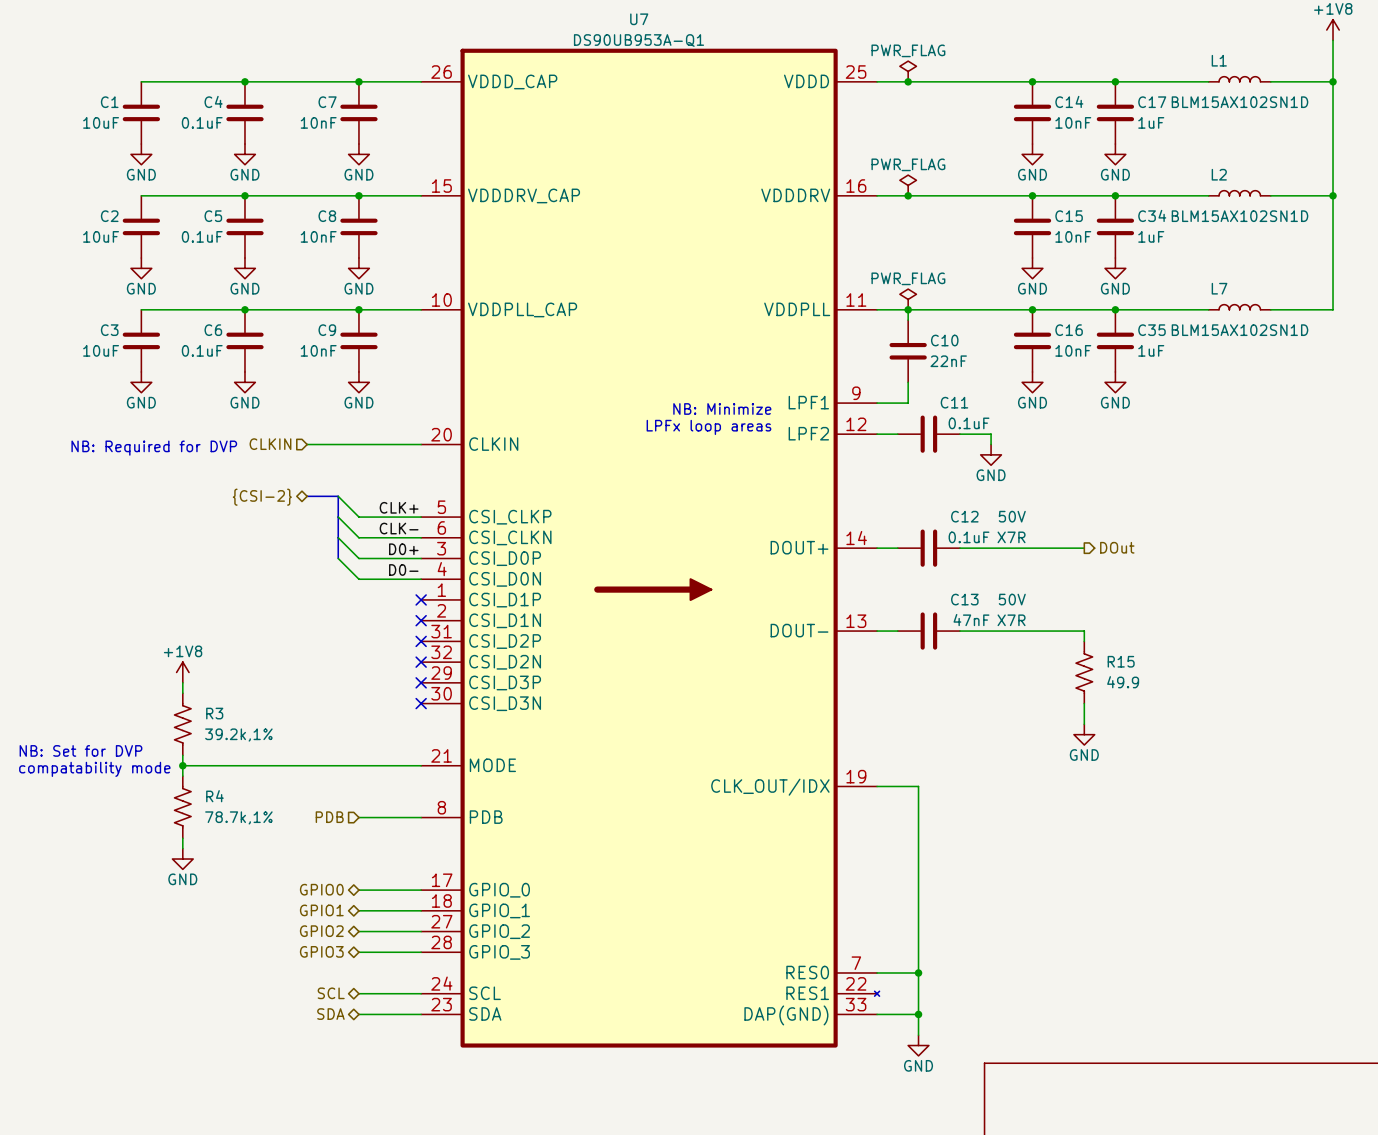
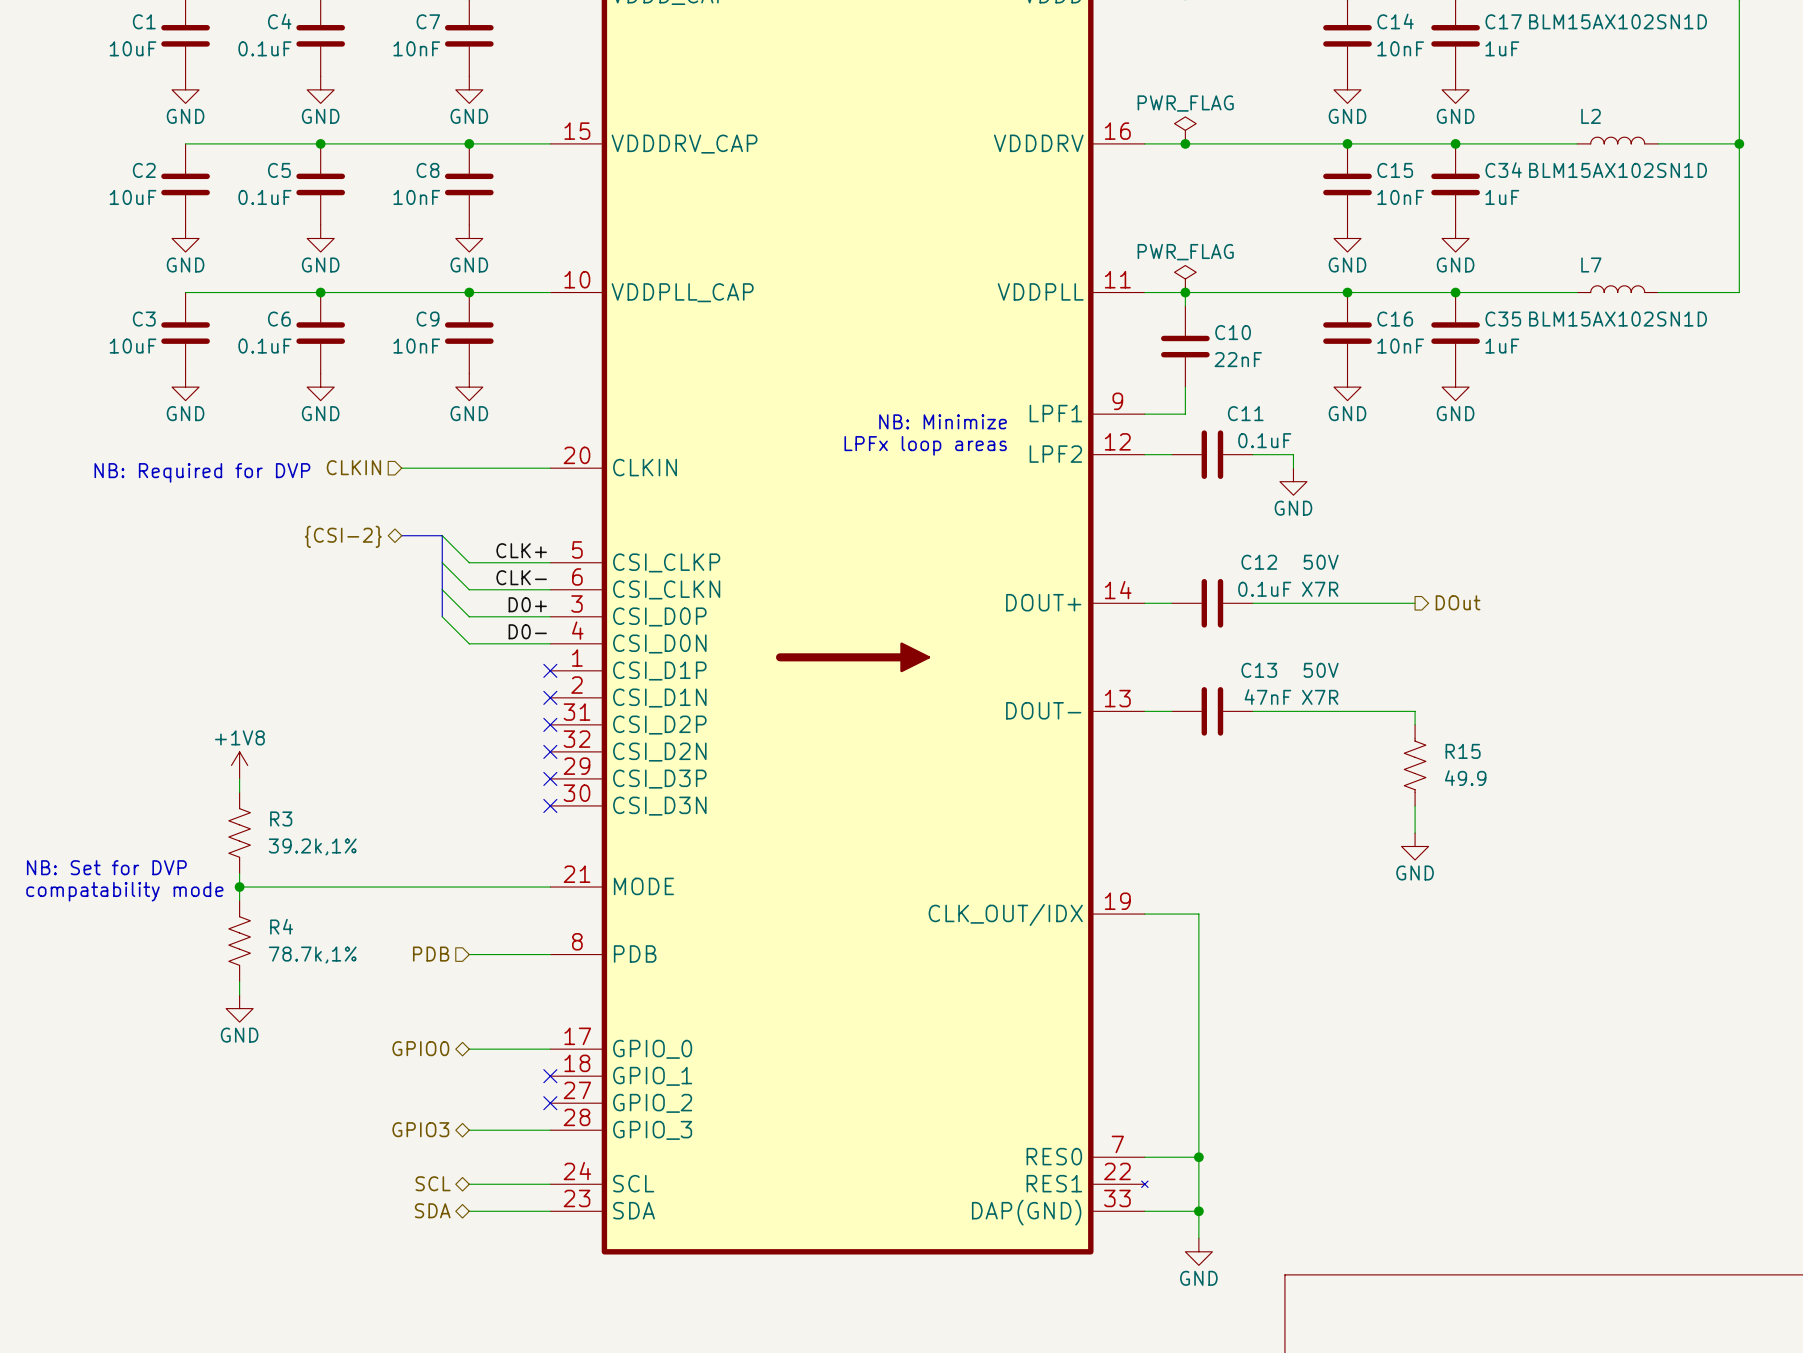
hierarchical label: GPIO1 (321, 910) -> none
wire: (358, 910) (421, 910) -> none
no-connect mark: none -> (550, 1076)
hierarchical label: GPIO2 (321, 931) -> none
wire: (358, 931) (421, 931) -> none
no-connect mark: none -> (550, 1103)

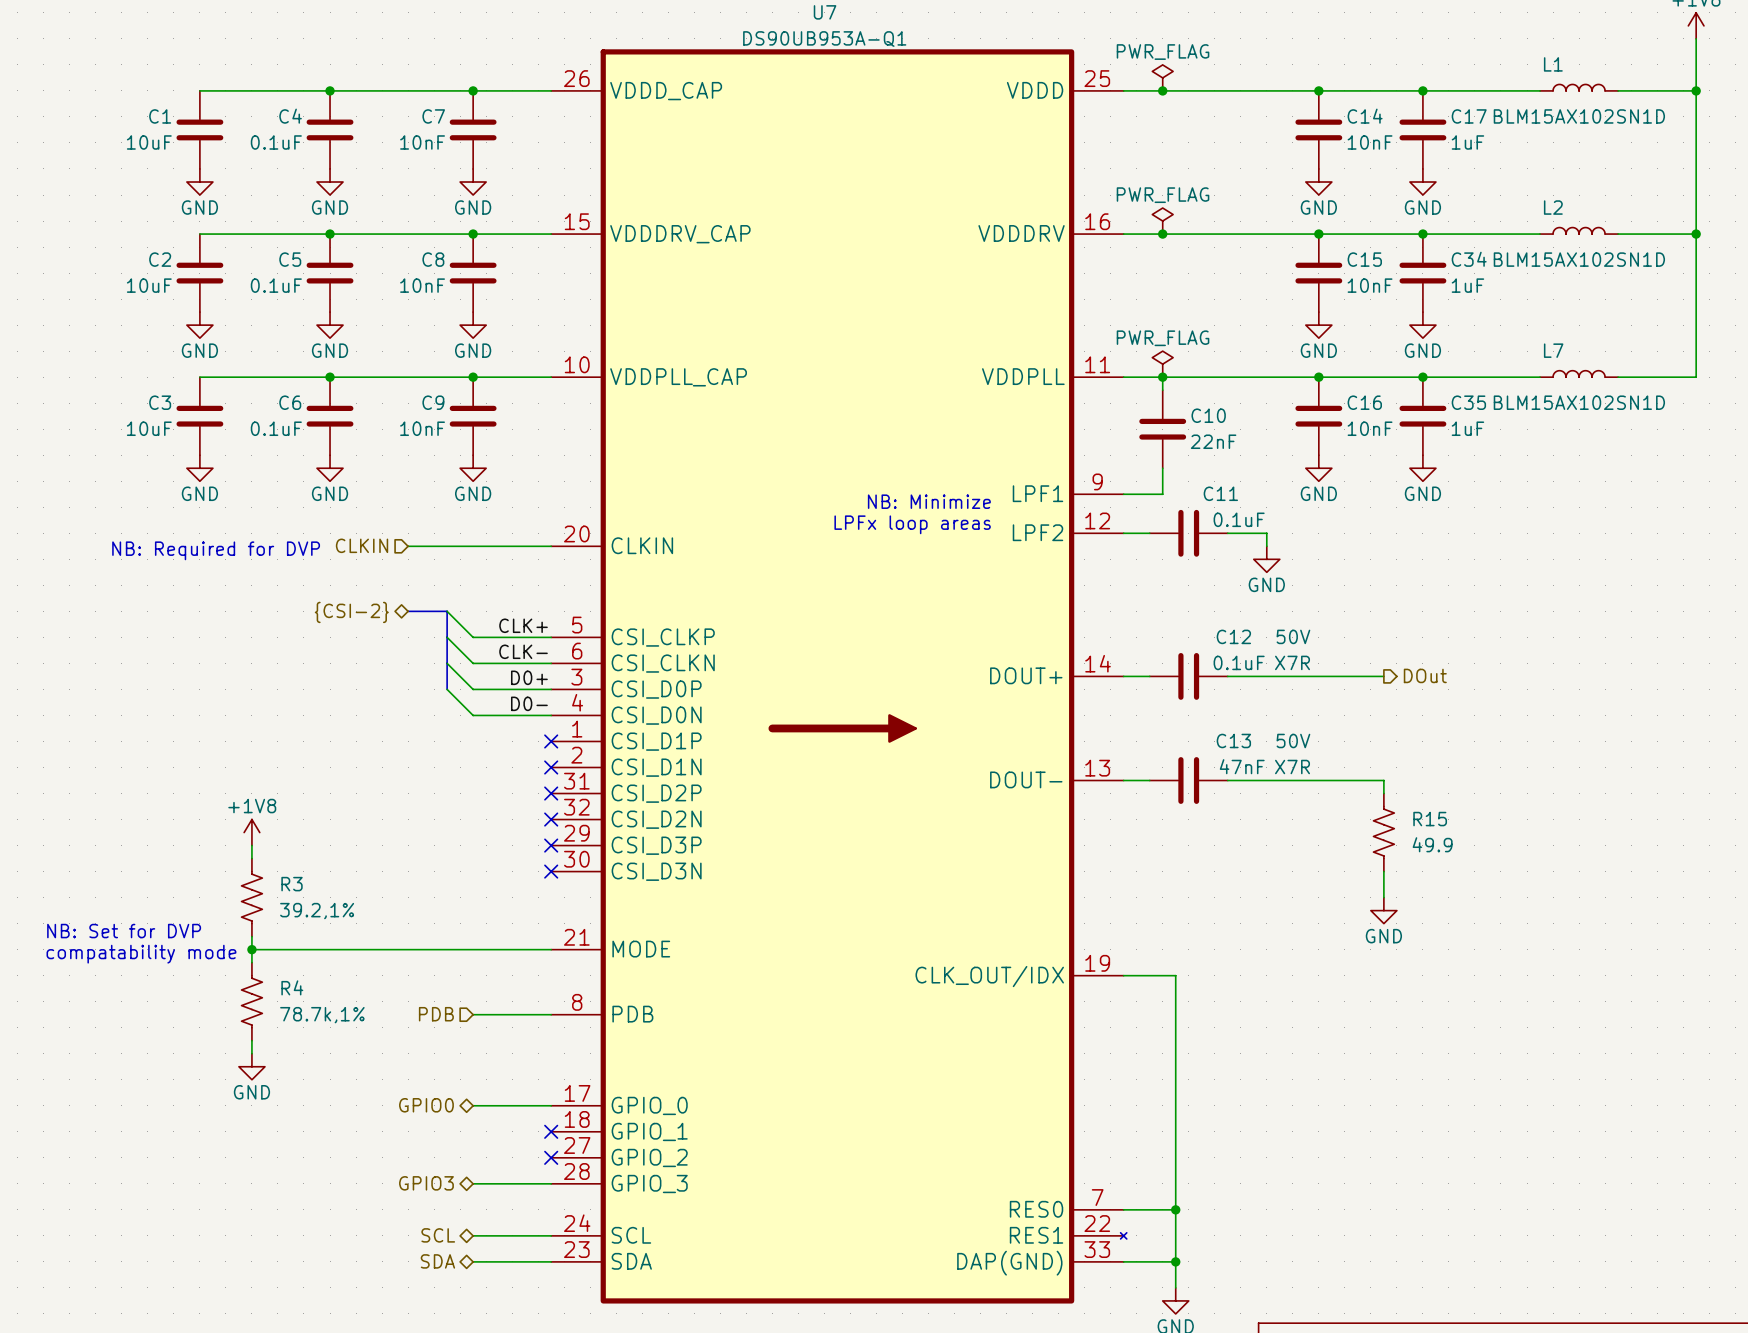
R3 value: 39.2k,1% (312, 846) -> 39.2,1% (317, 911)

